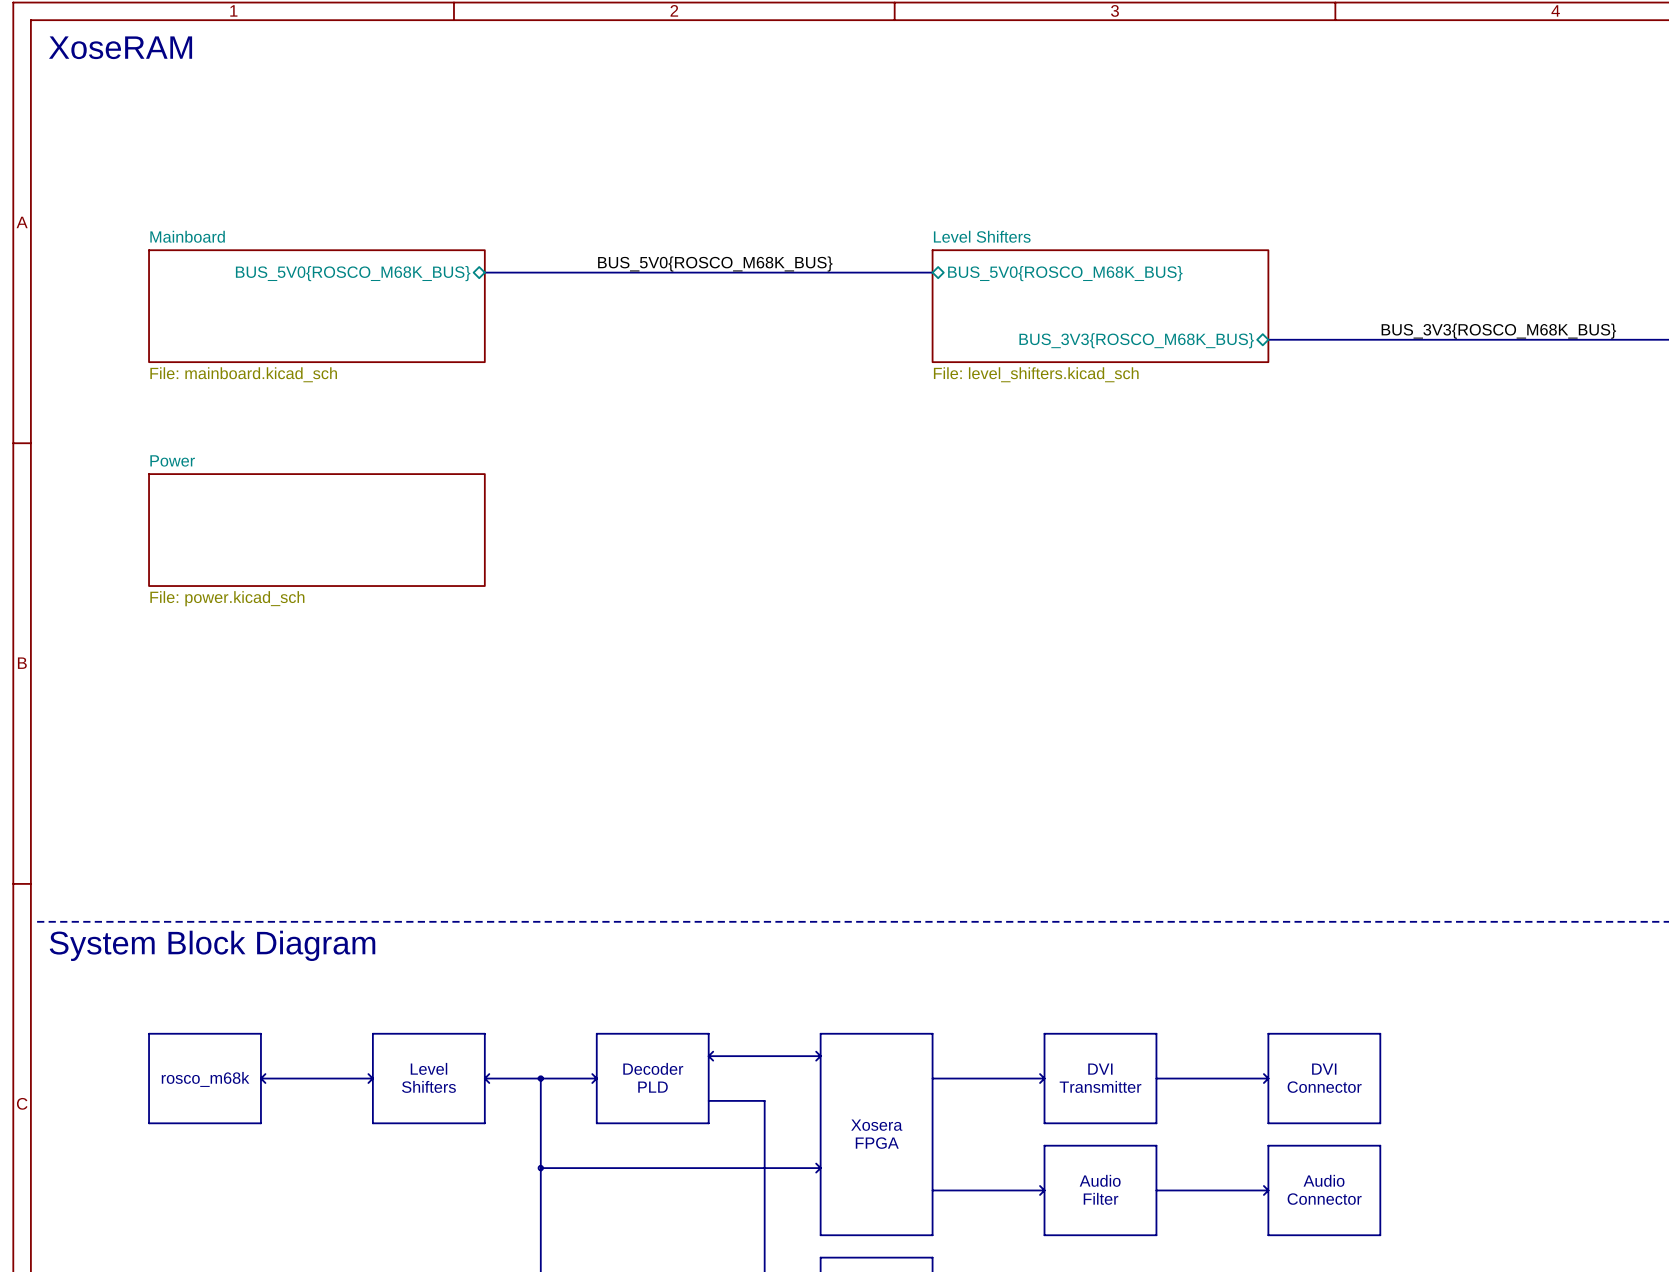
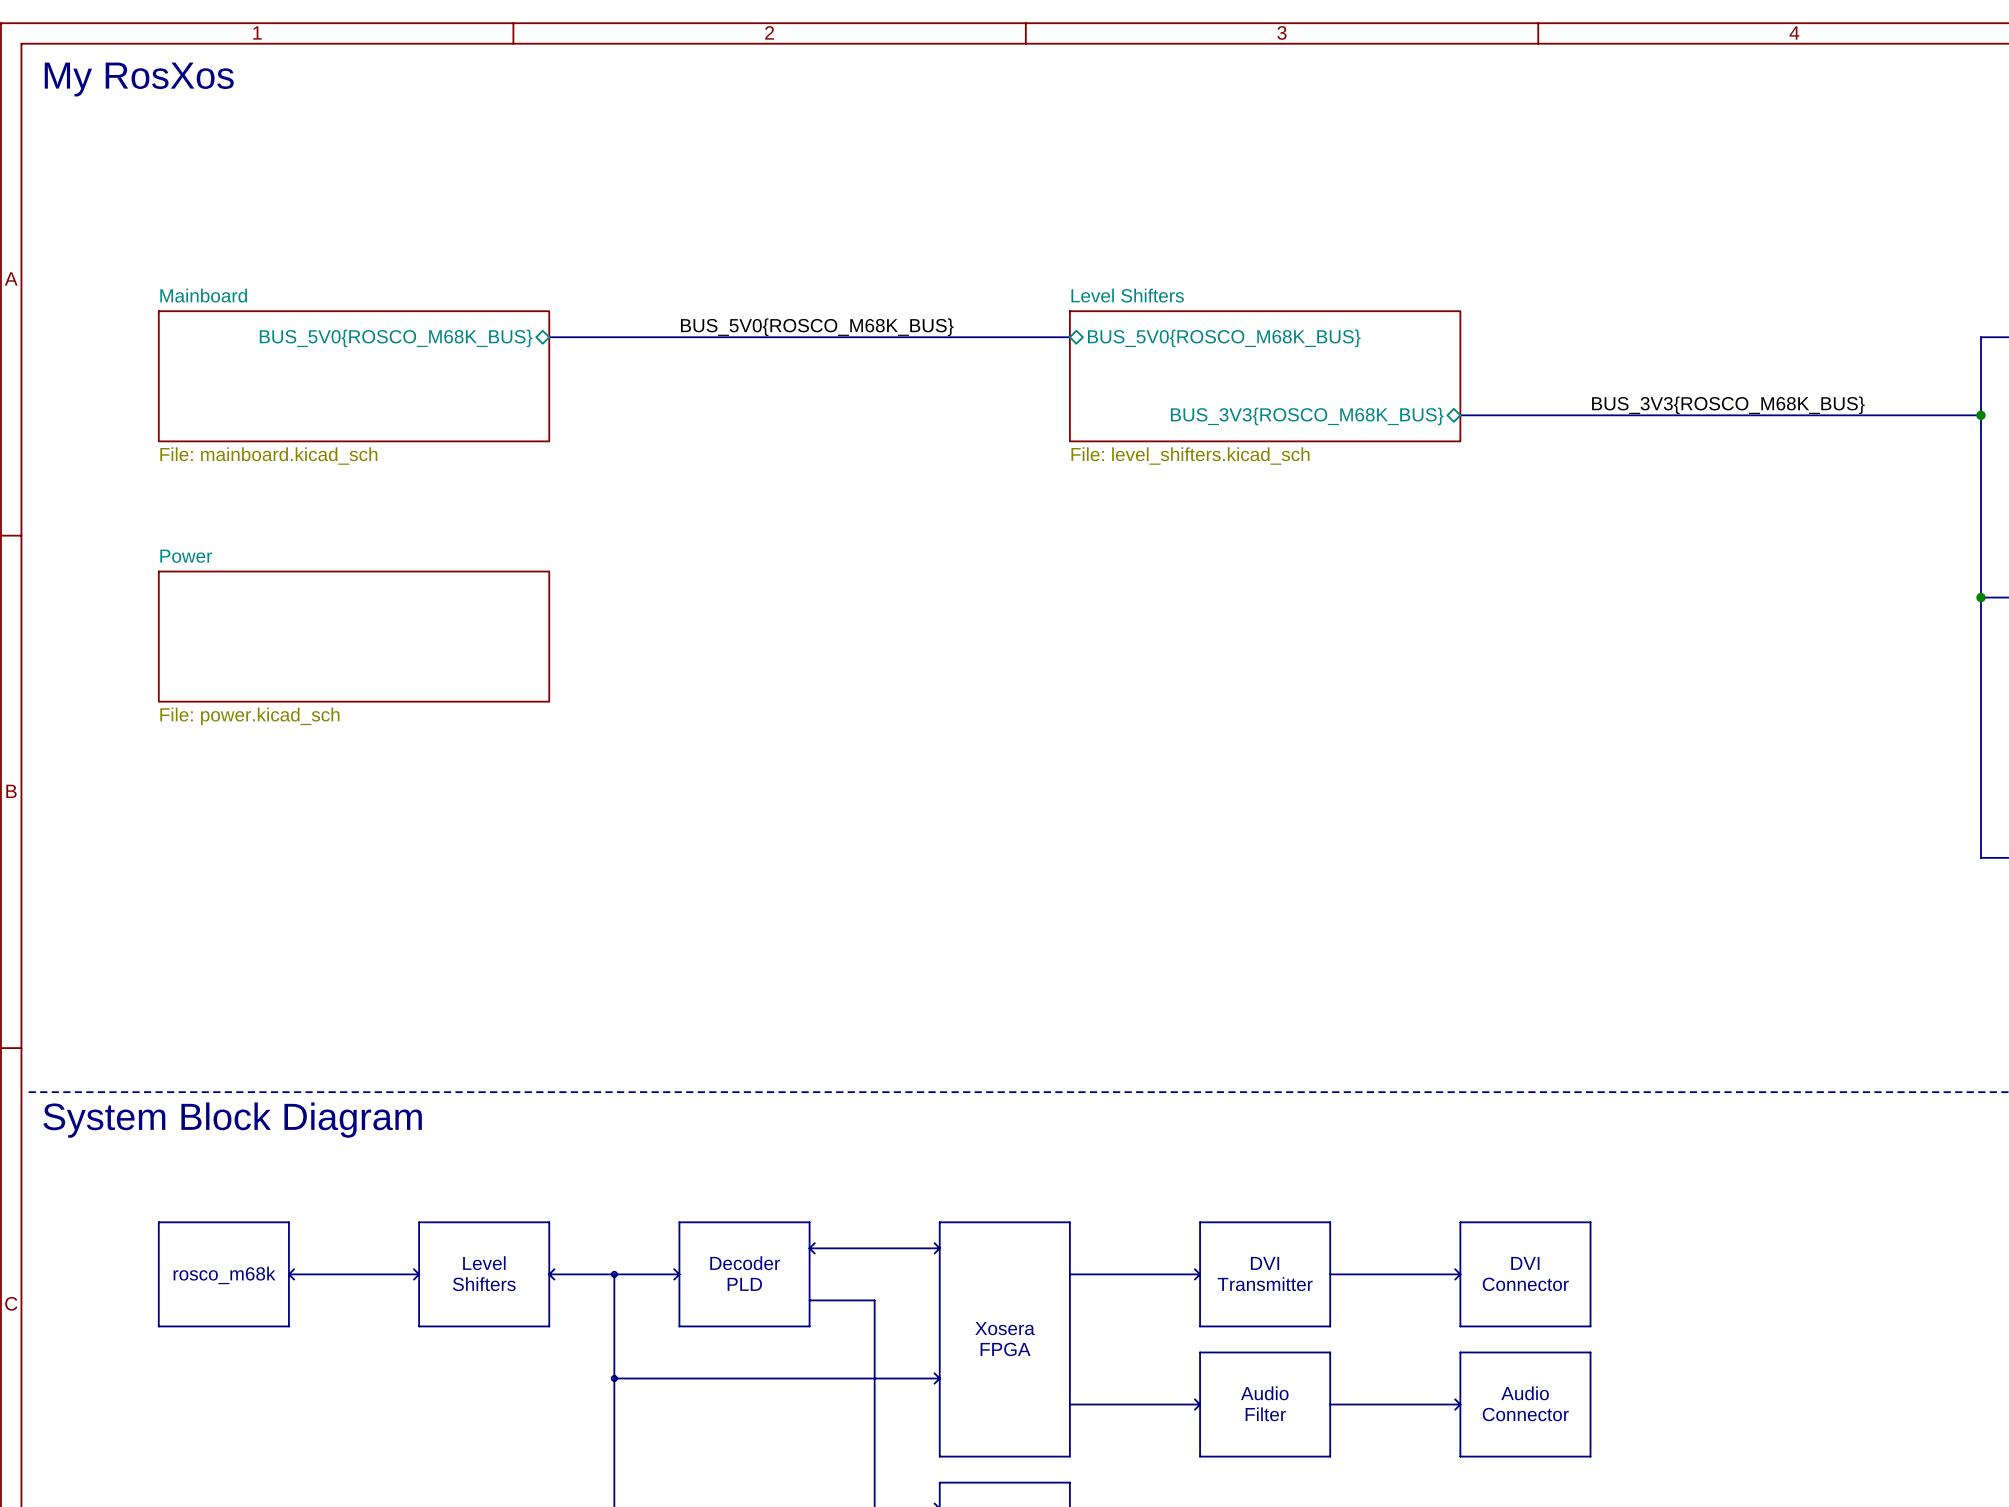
text: XoseRAM (120, 47) -> My RosXos (139, 79)

